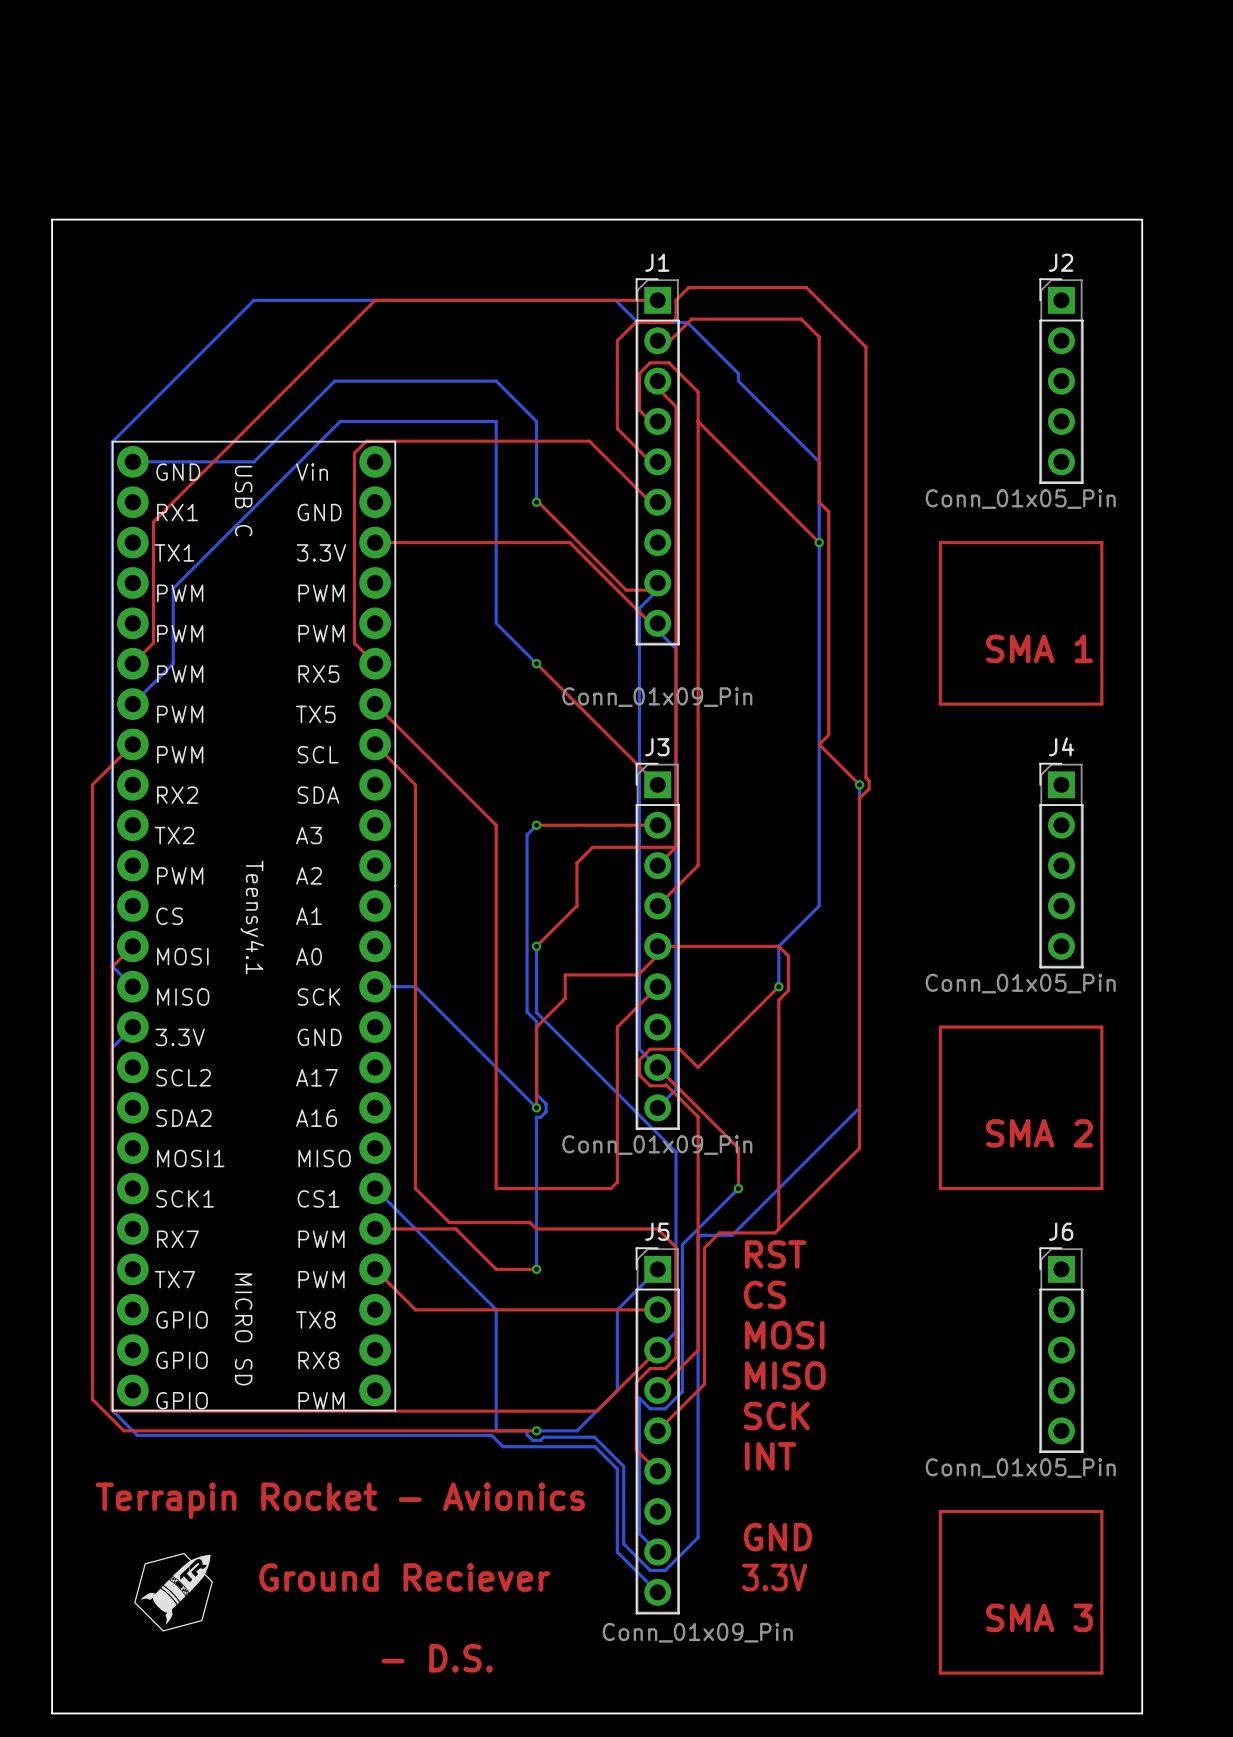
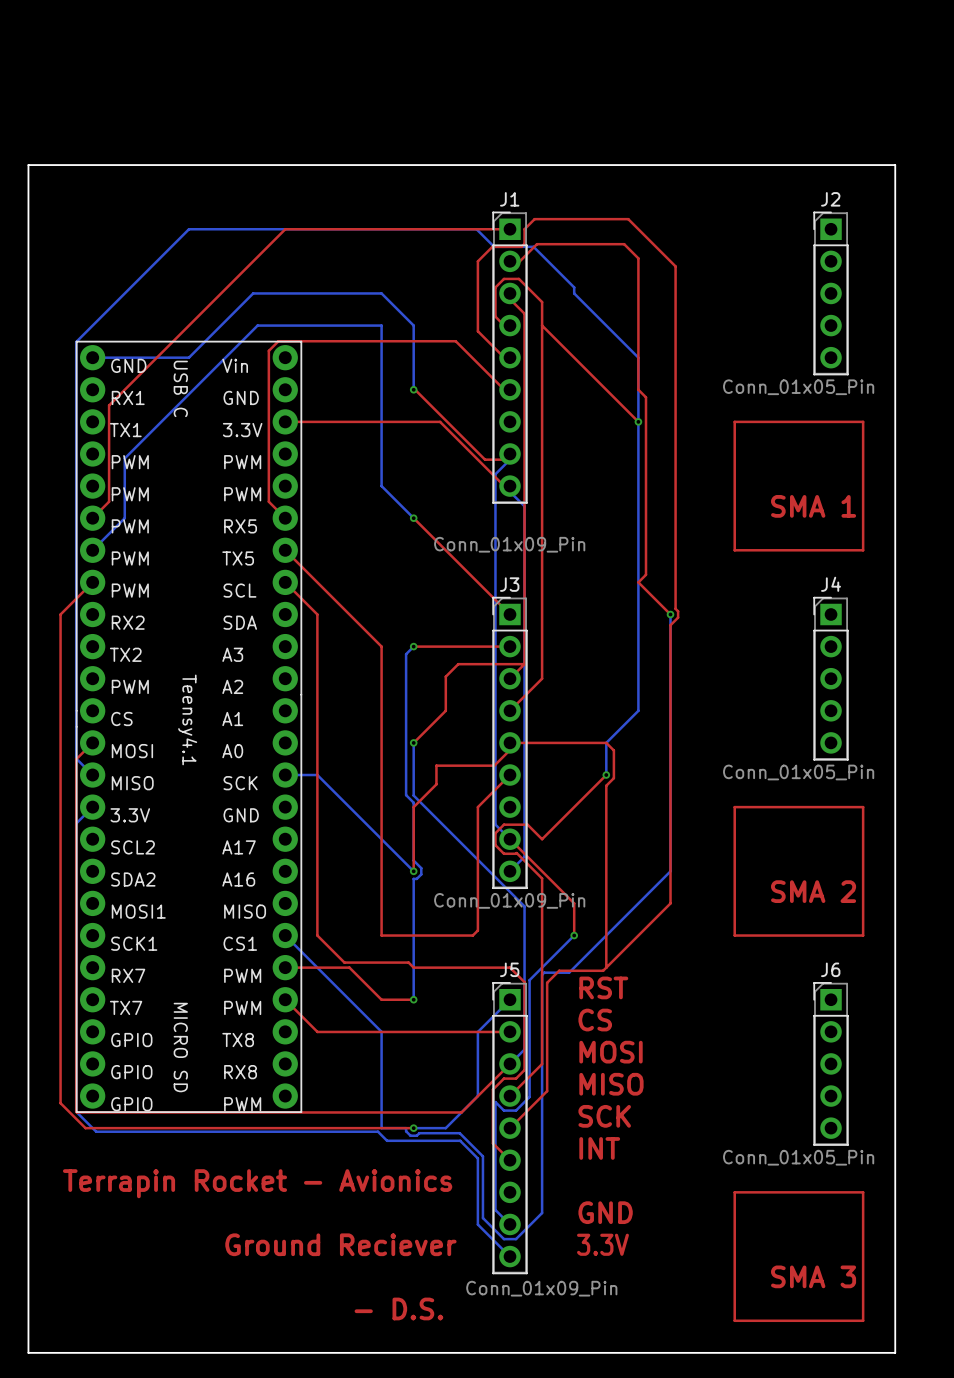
drawing: [134, 1552, 213, 1632] -> none
text position: Ground Reciever (404, 1577) -> Ground Reciever (340, 1244)
text position: - D.S. (437, 1658) -> - D.S. (398, 1308)

